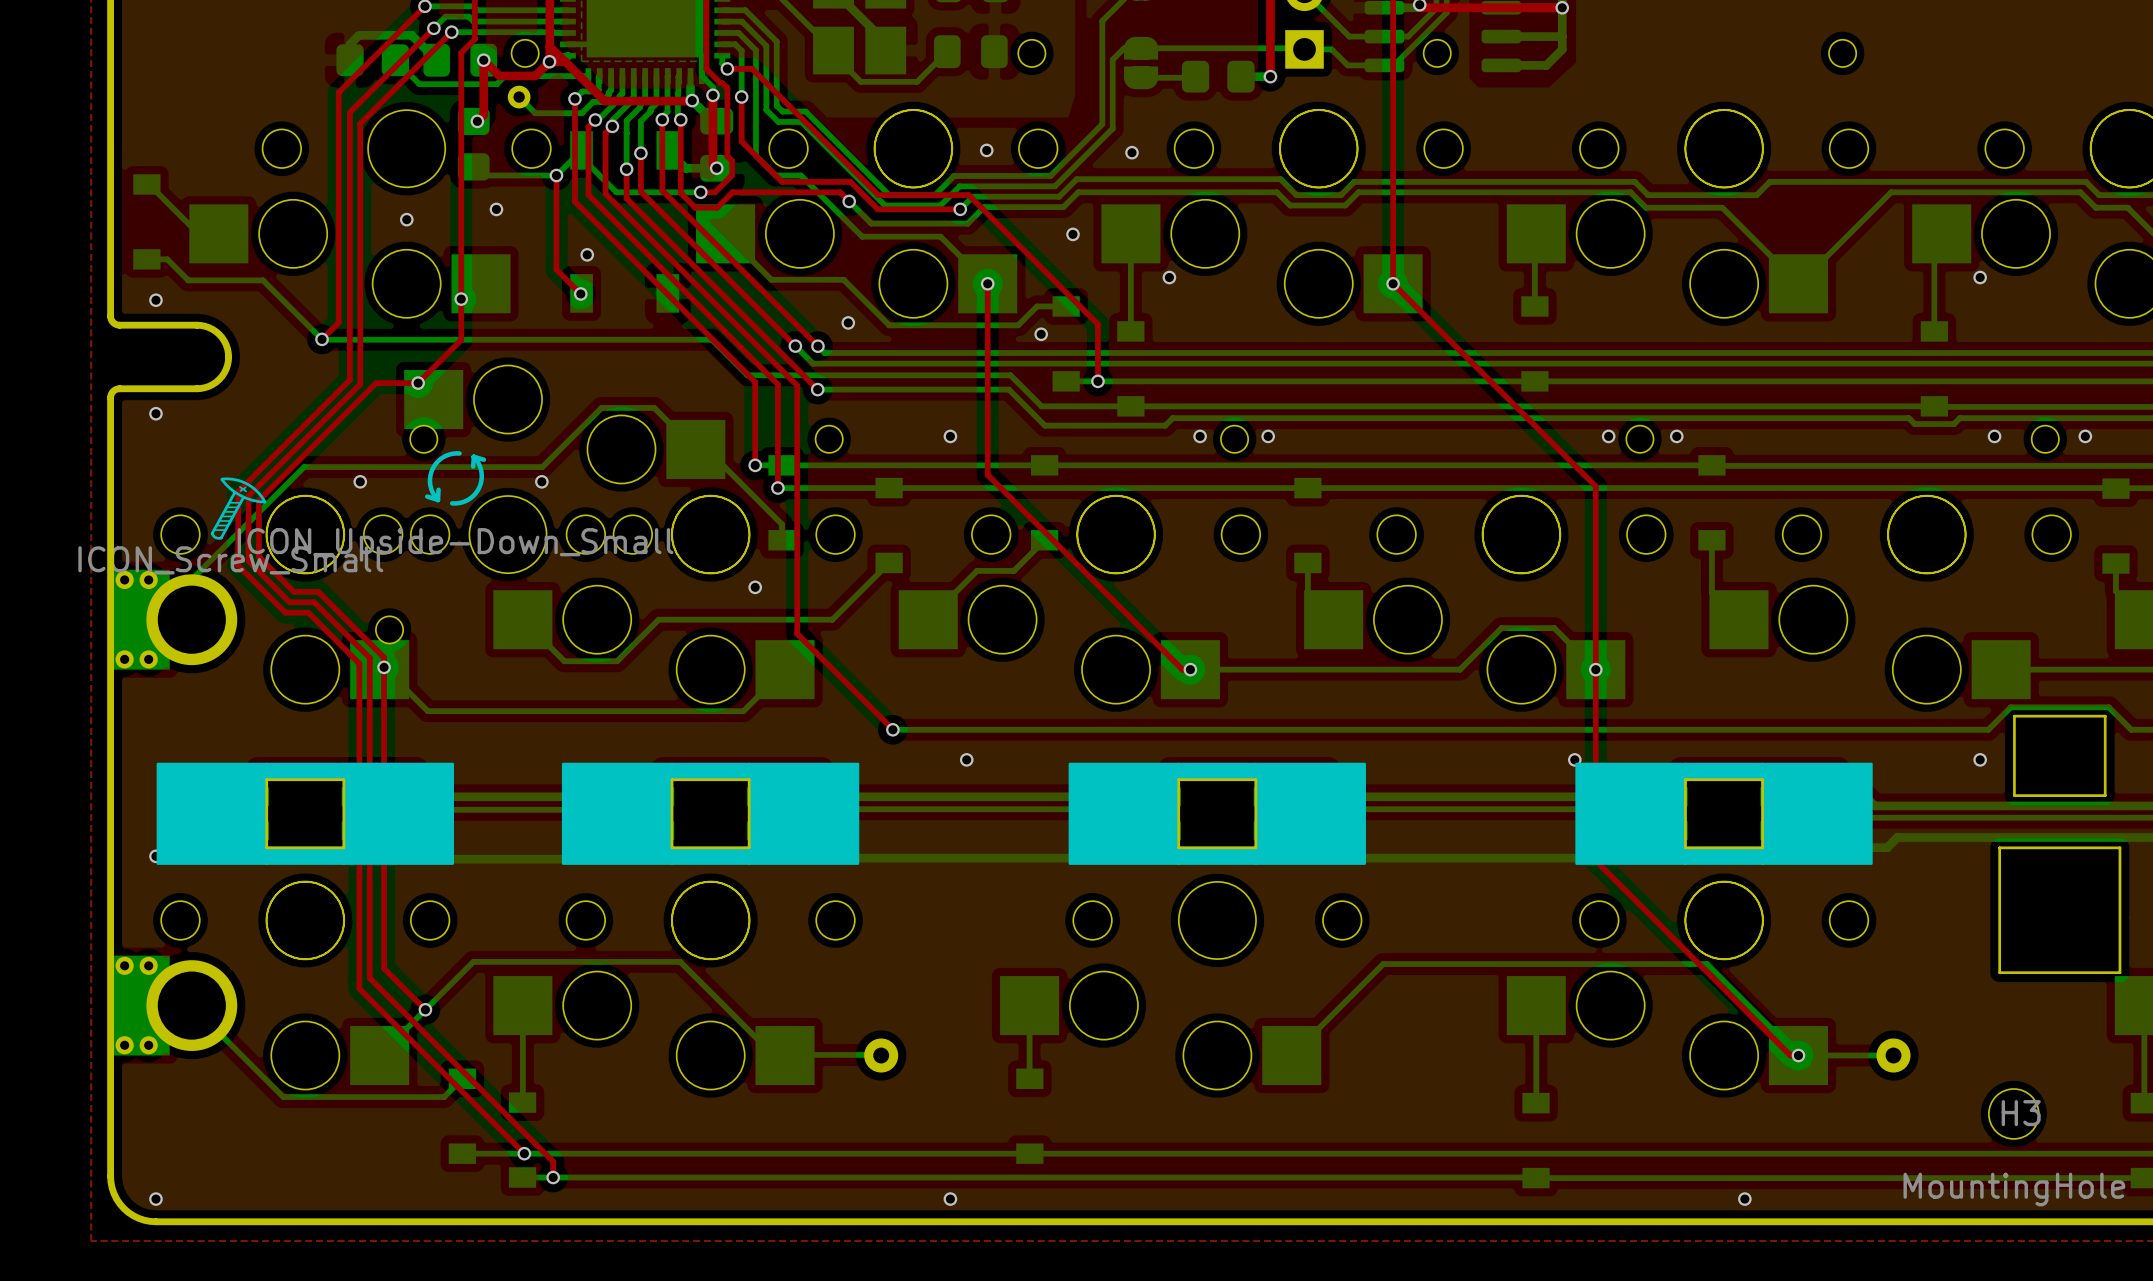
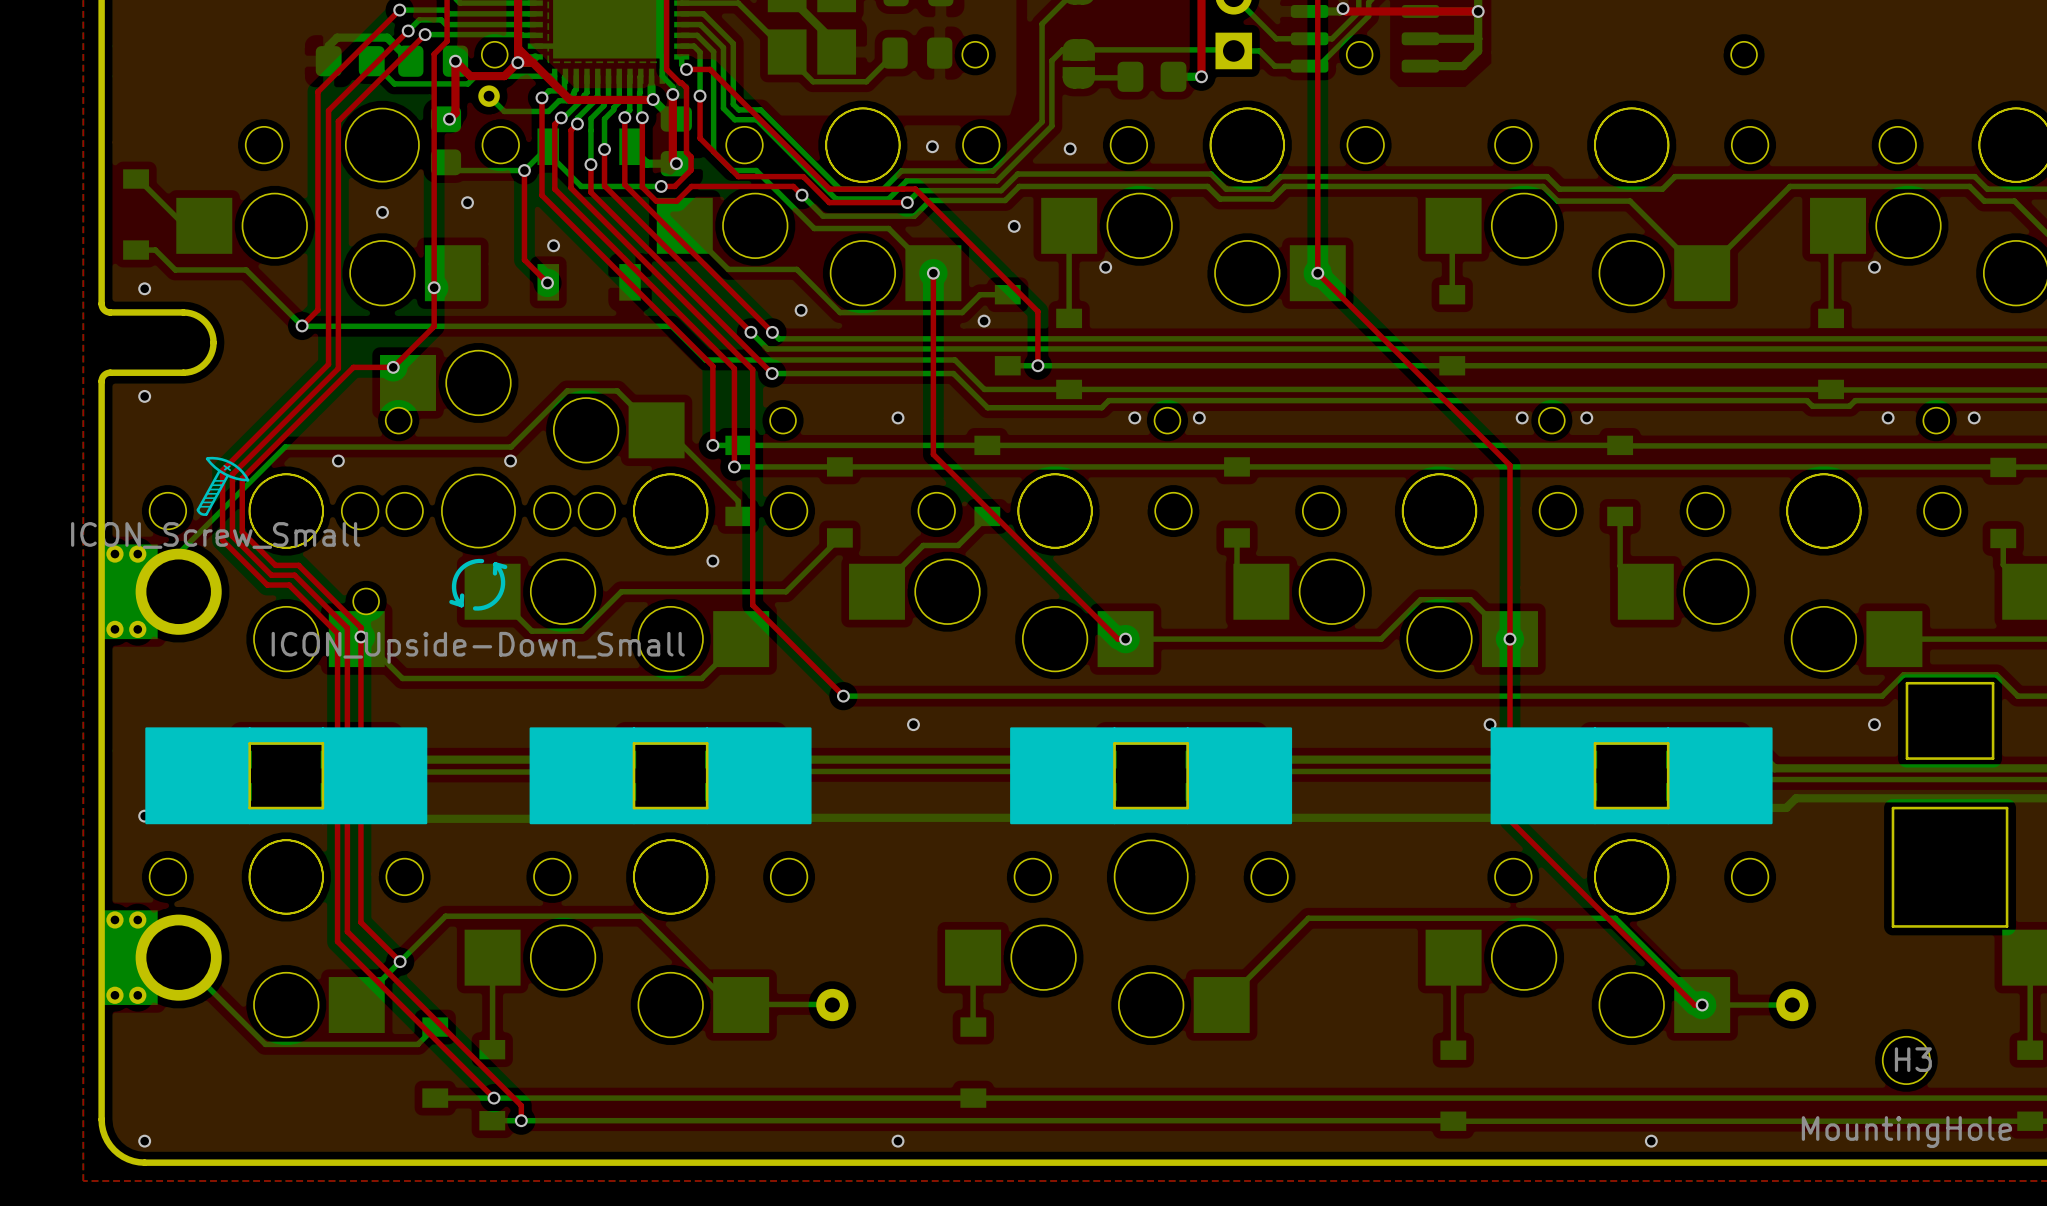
drawing position: (455, 478) -> (478, 584)

